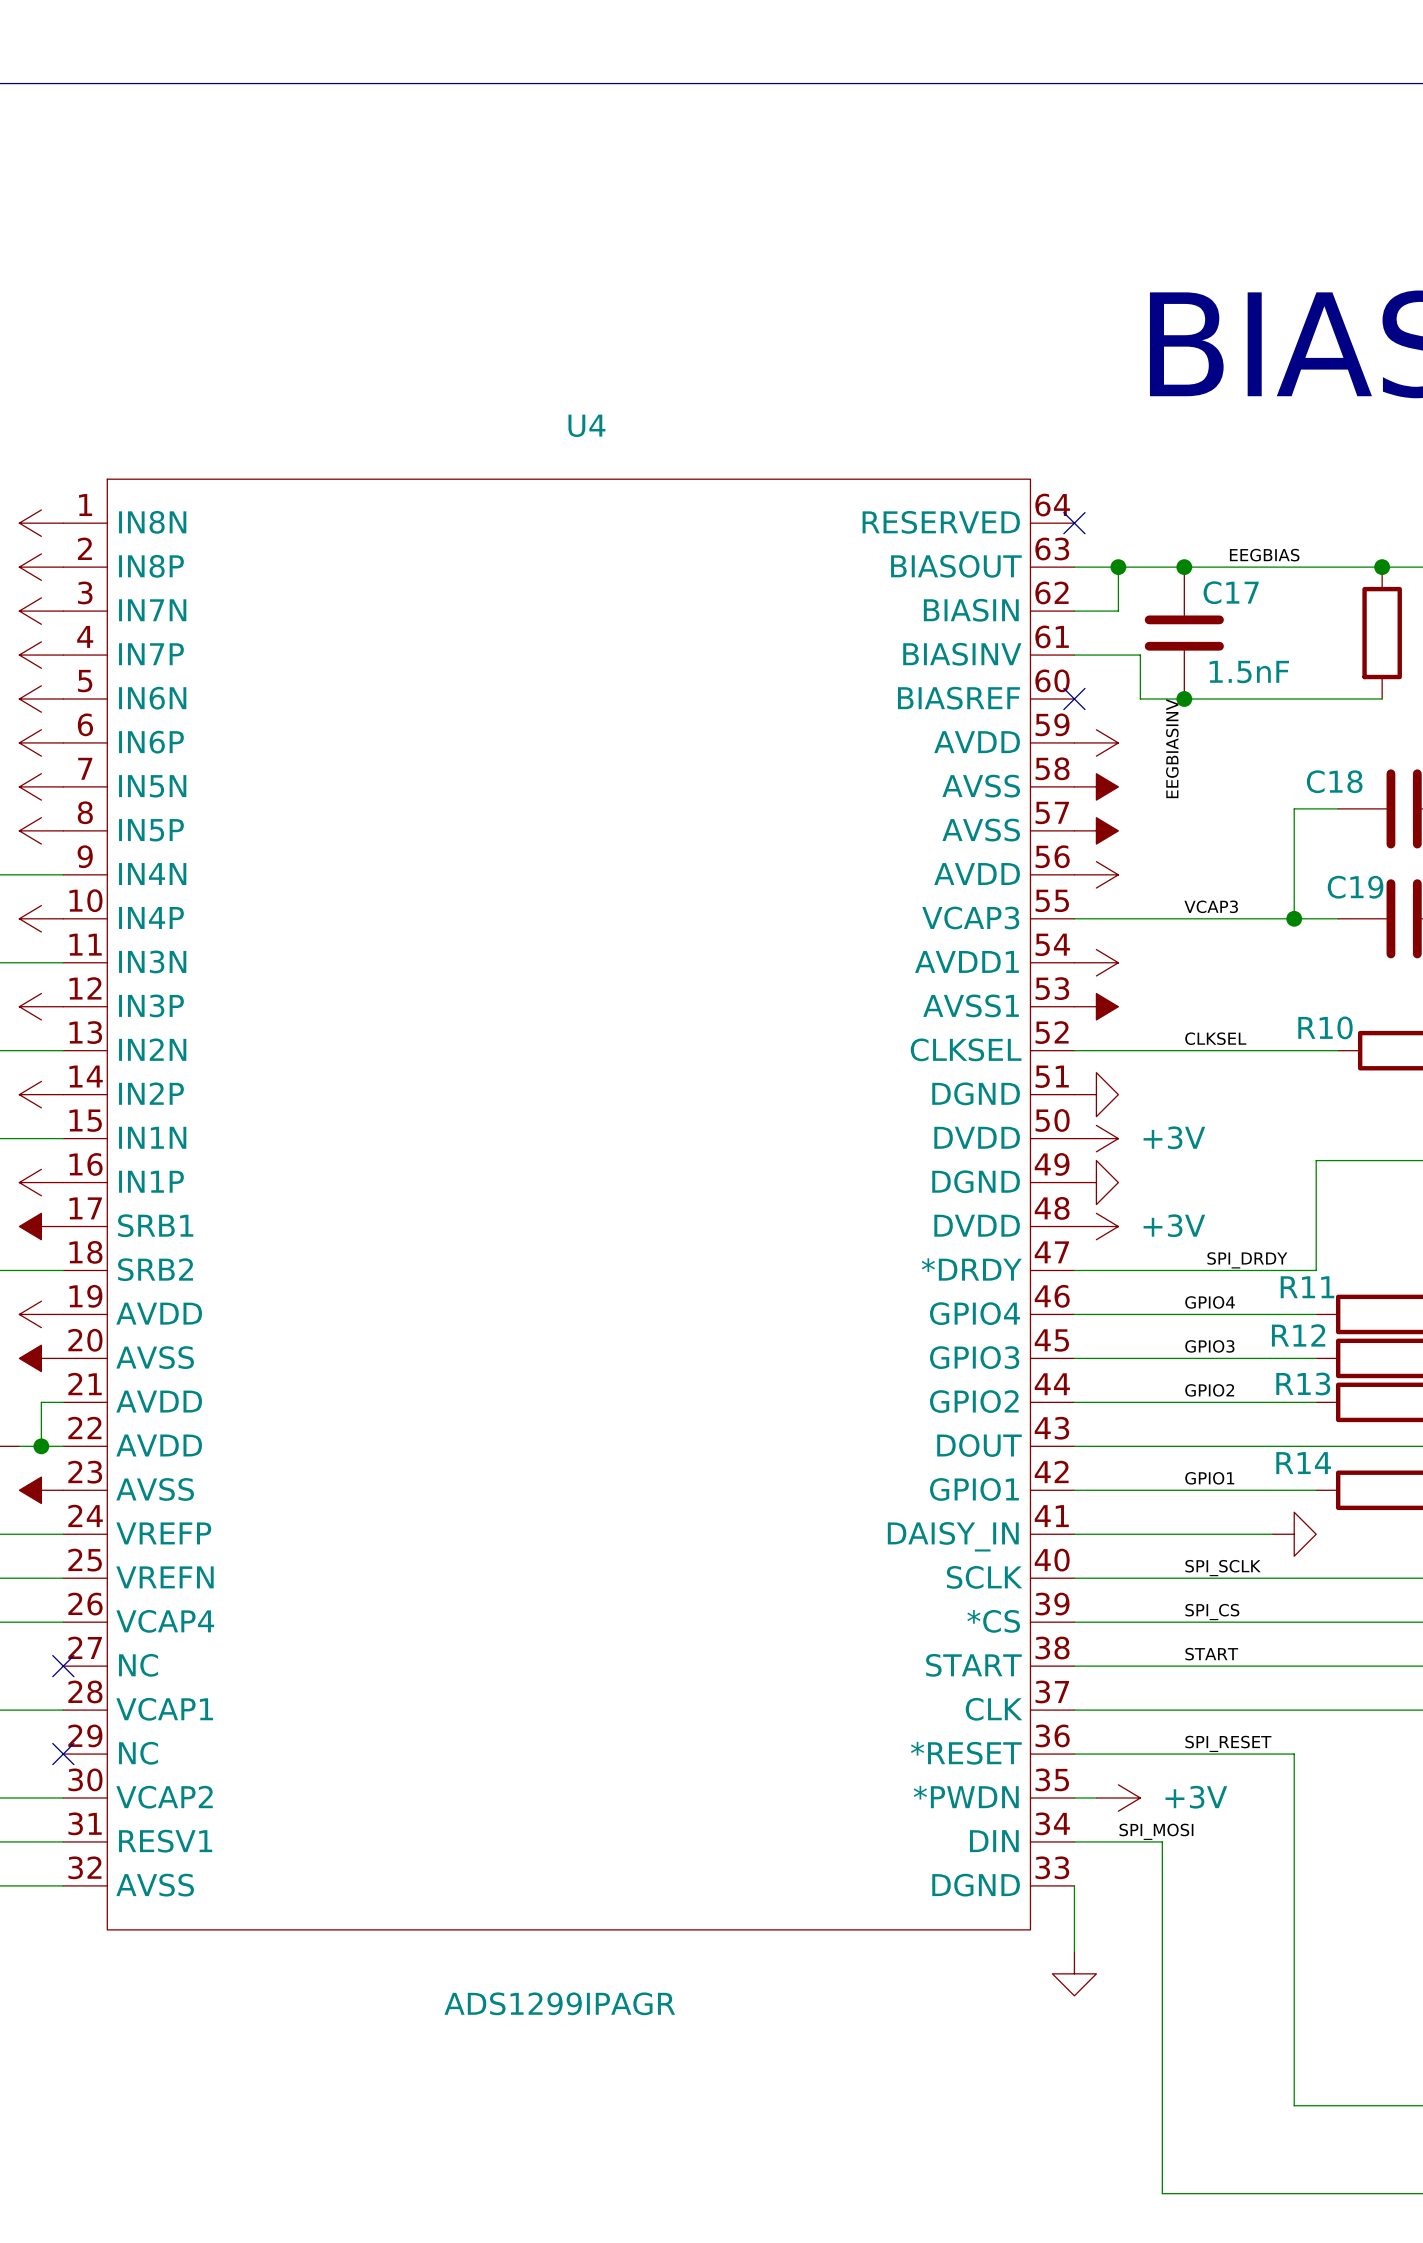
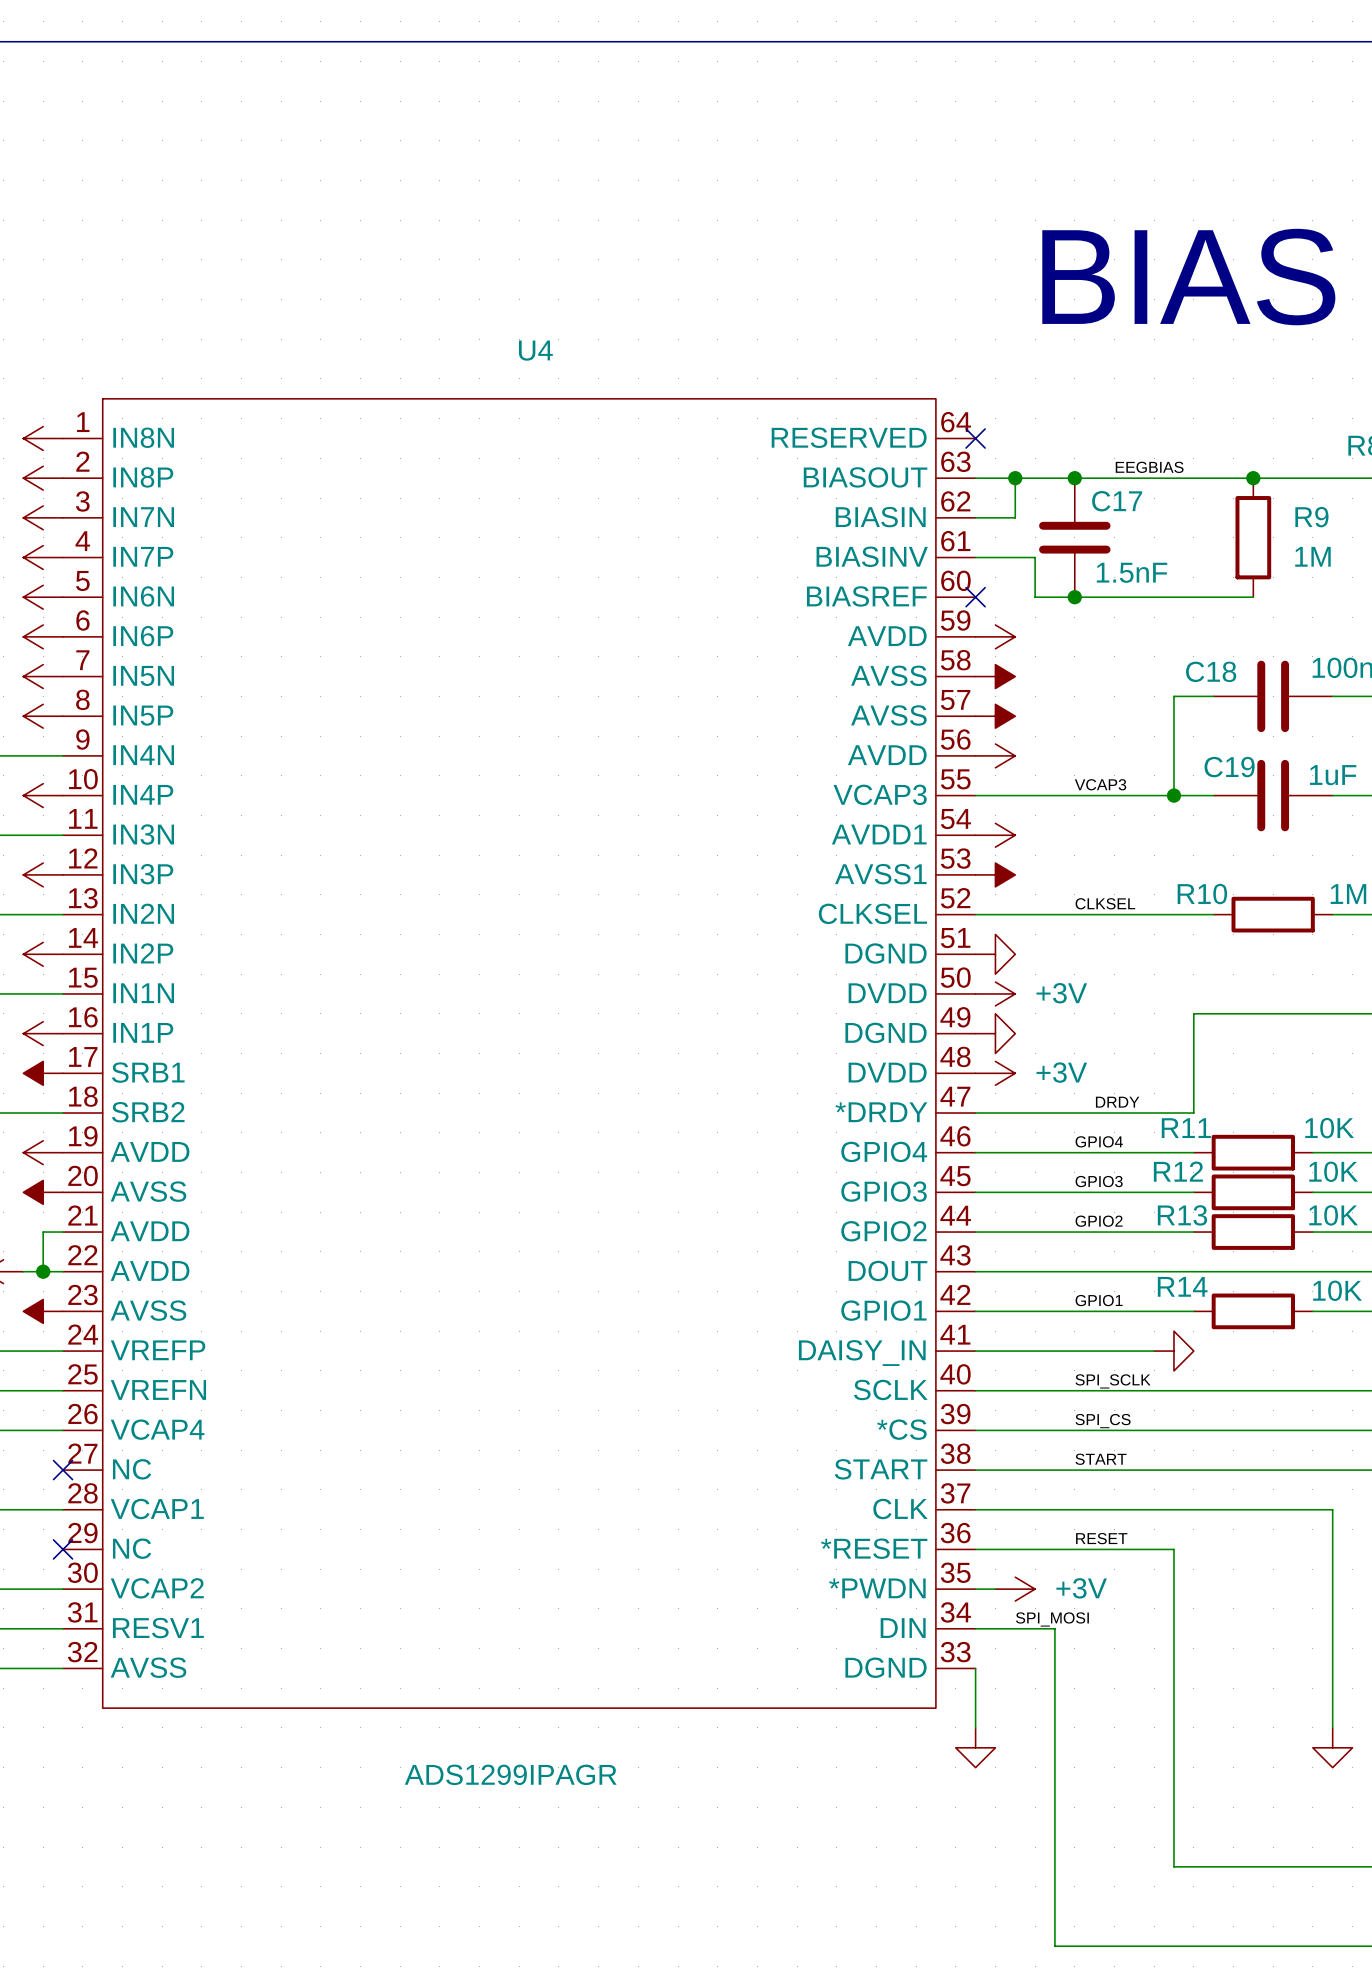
label: EEGBIASINV (1172, 748) -> none
label: SPI_DRDY (1247, 1260) -> DRDY (1117, 1102)
label: SPI_RESET (1228, 1743) -> RESET (1101, 1538)

